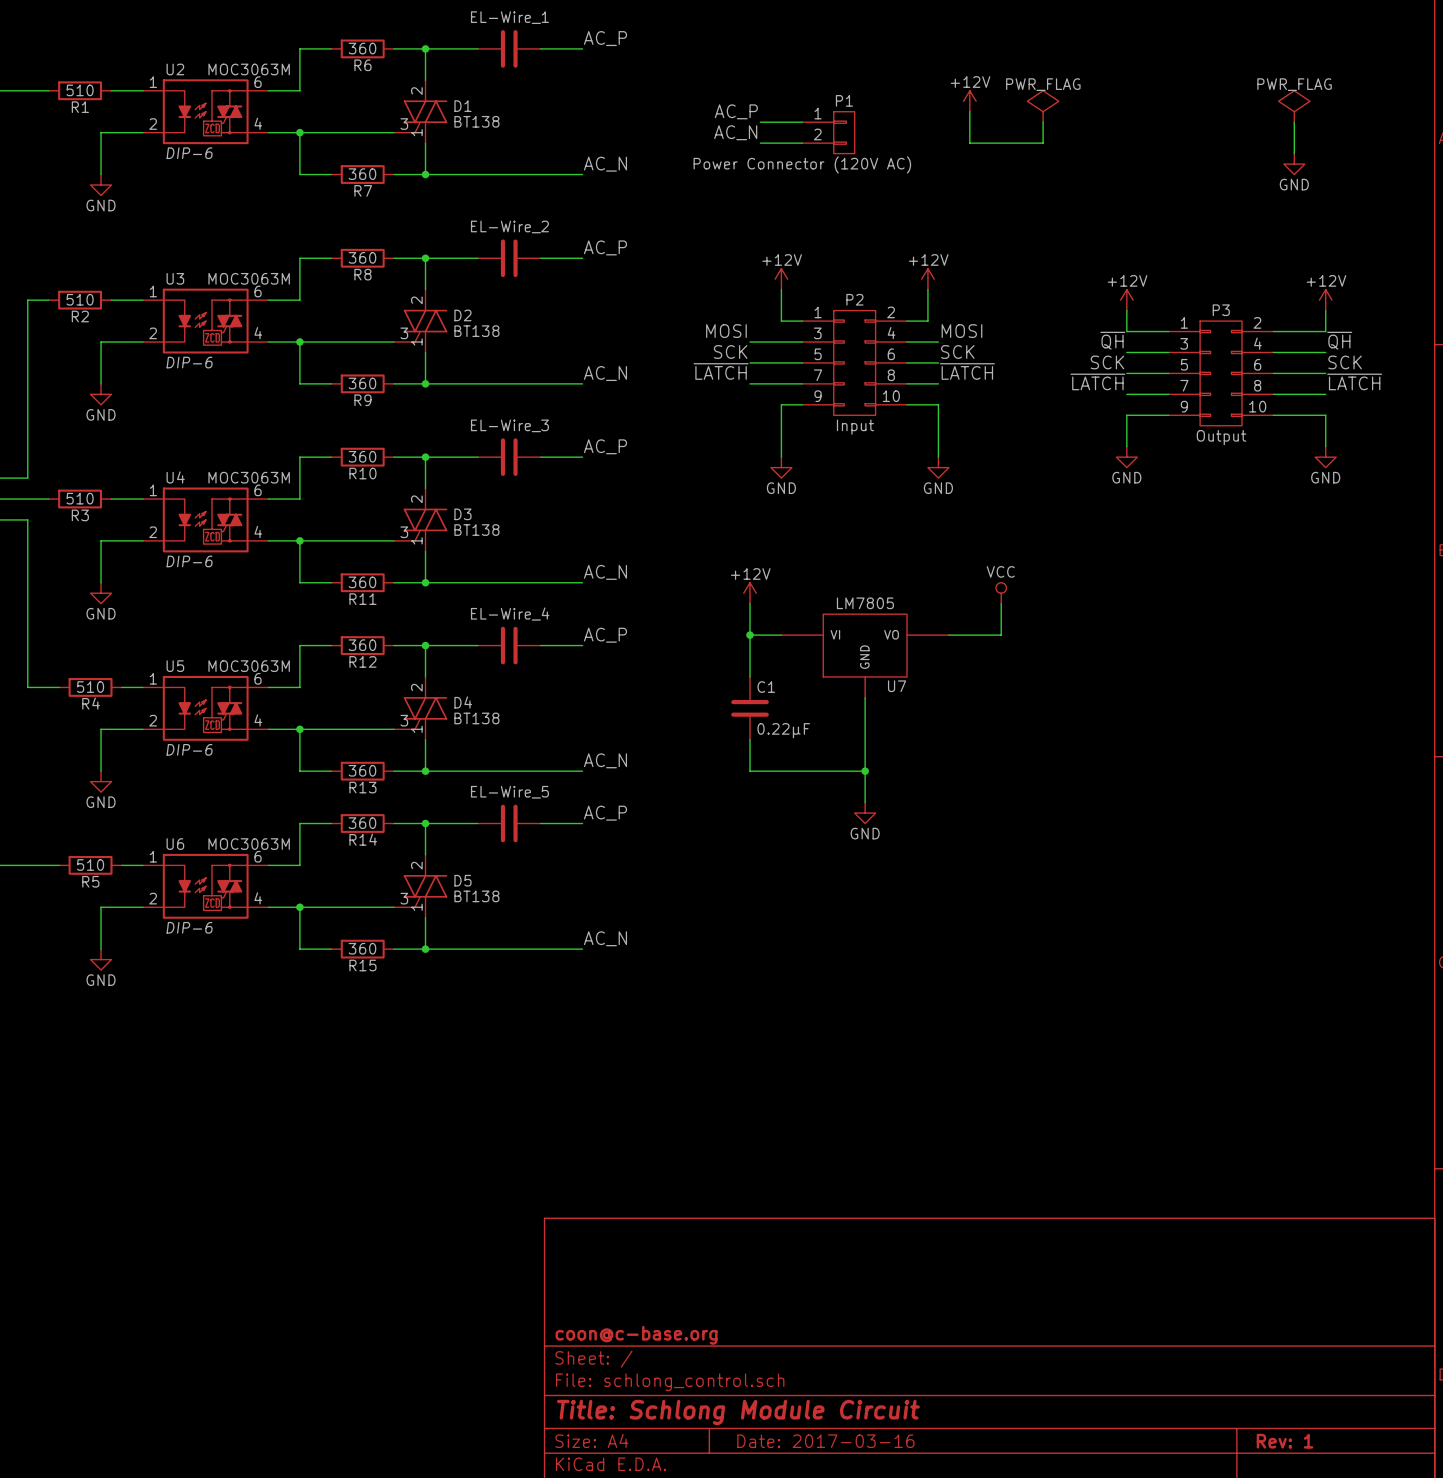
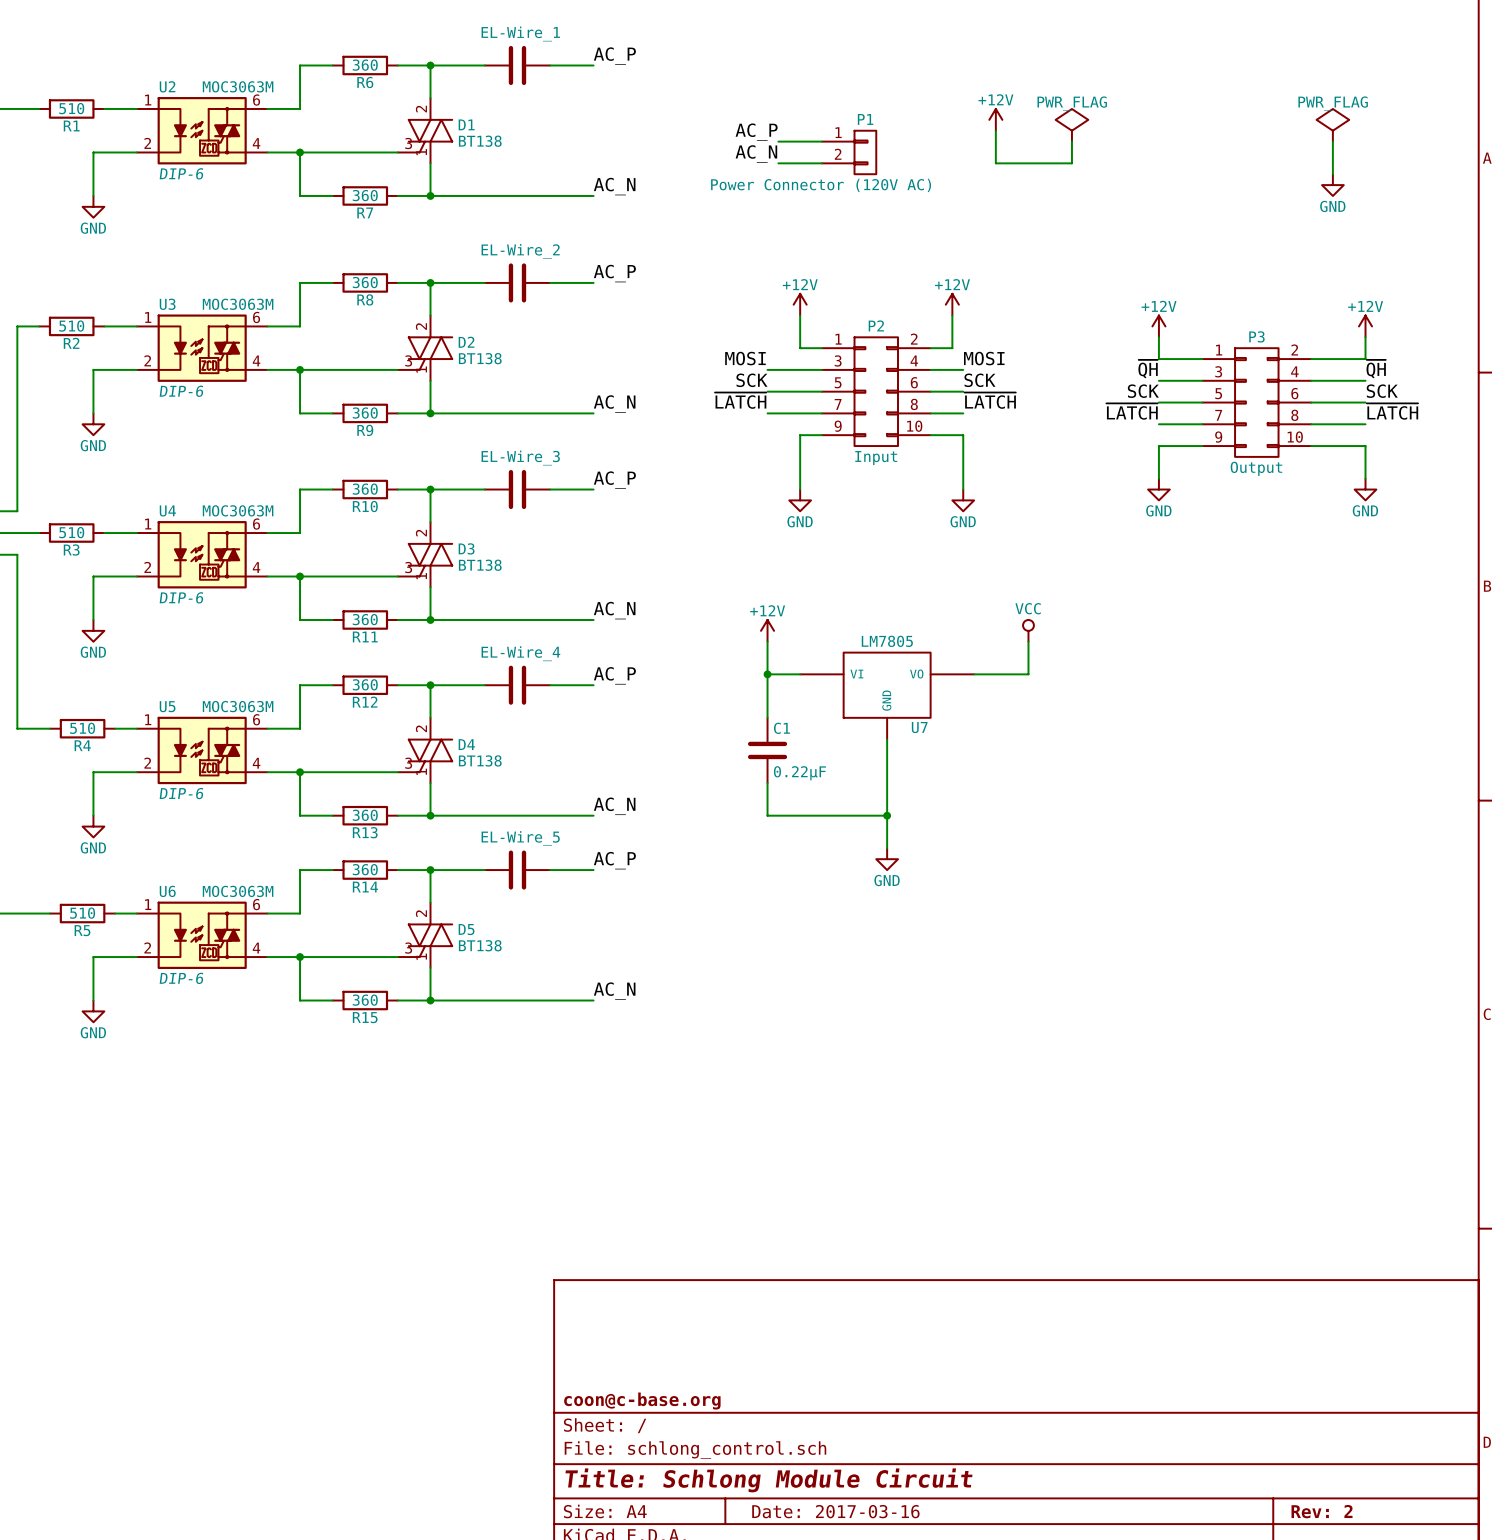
title block: Rev: 1 (1285, 1441) -> Rev: 2 (1322, 1511)

